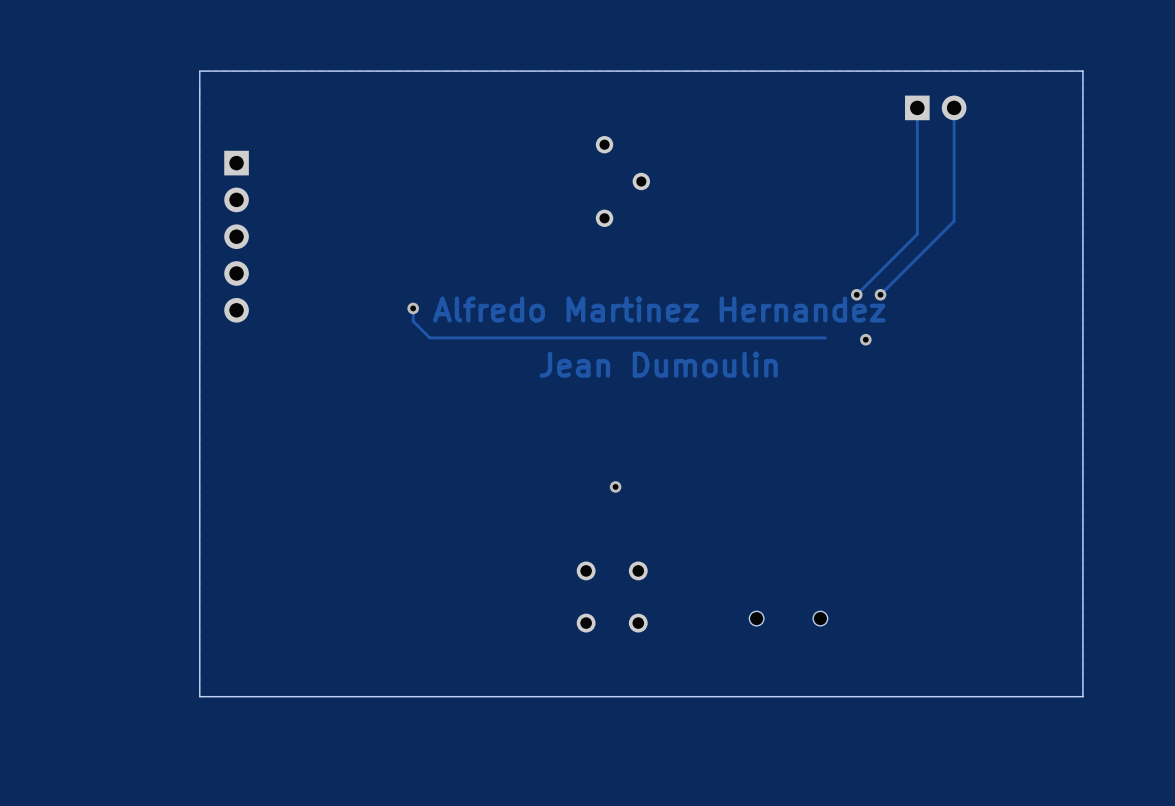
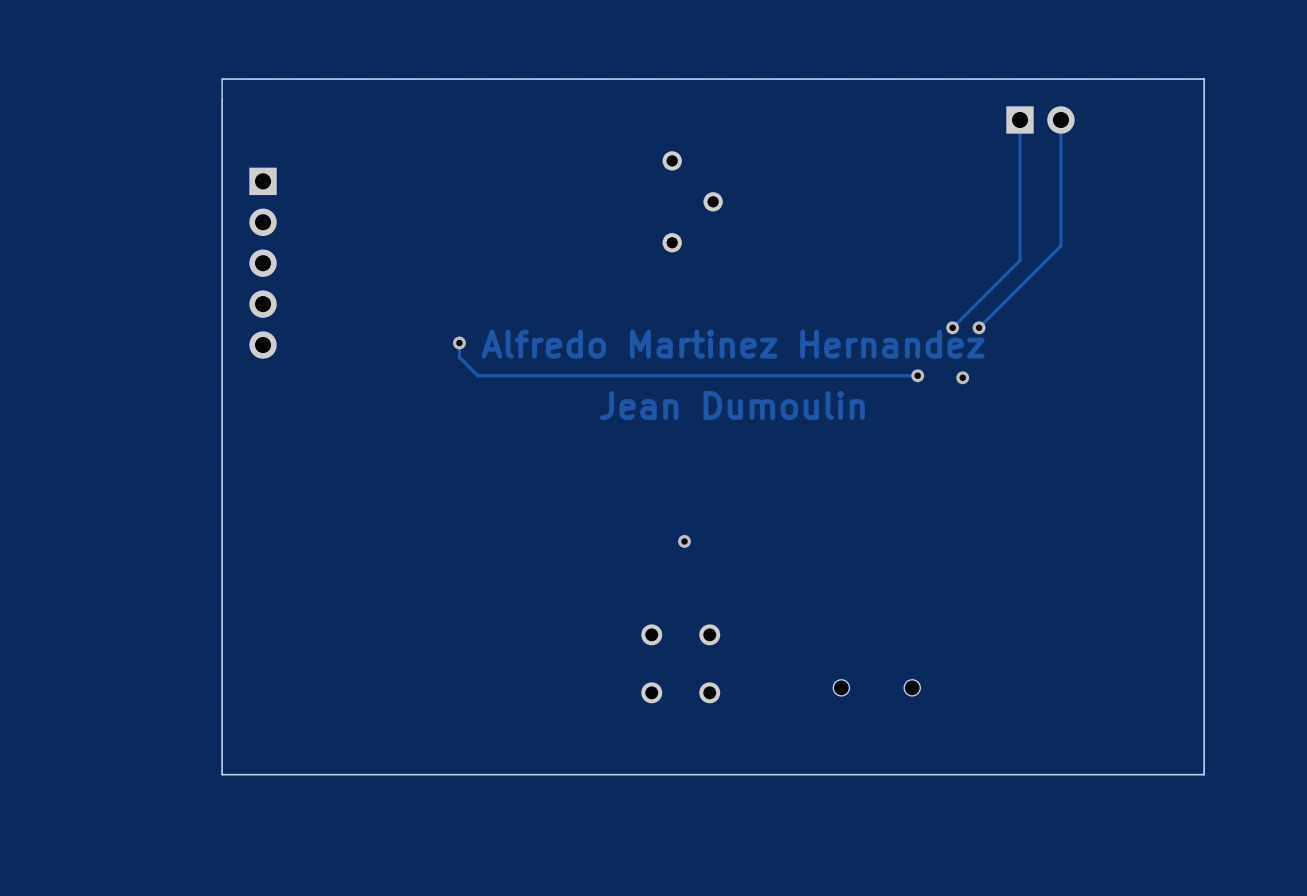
via: none -> (917, 375)

